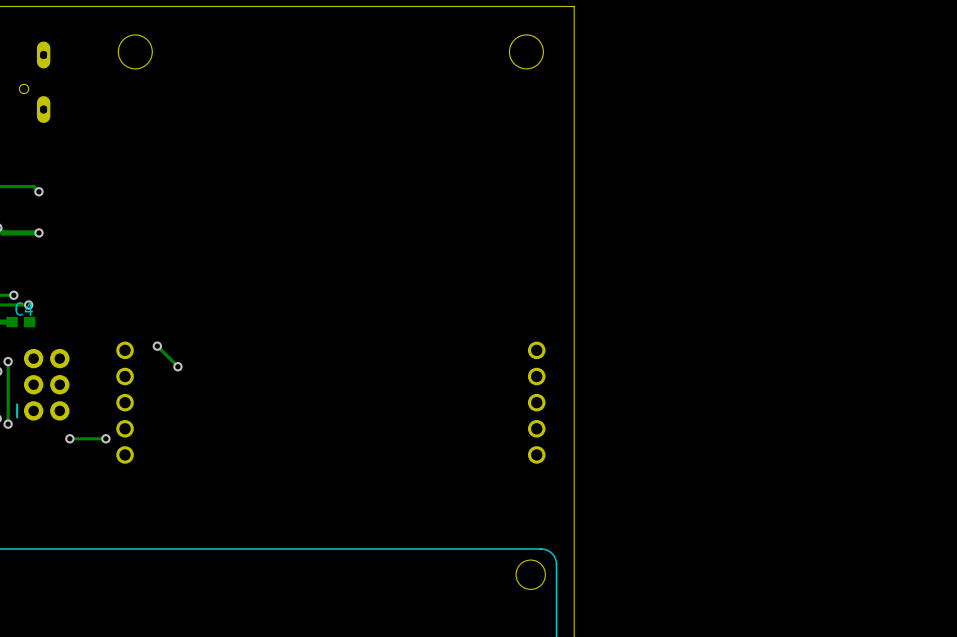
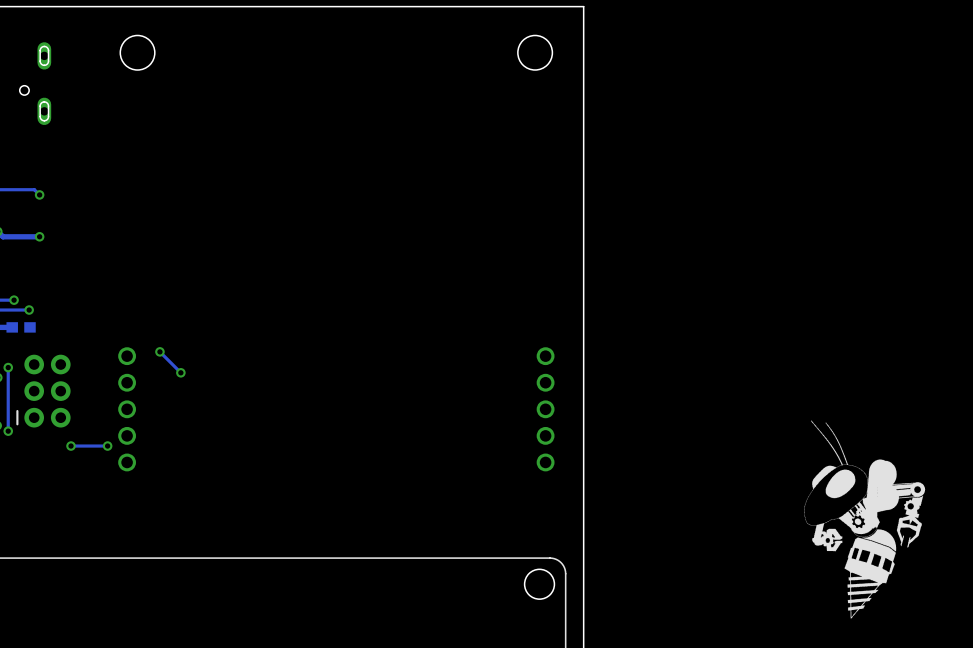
C4 name: C4 (24, 309) -> none
drawing: none -> [804, 420, 926, 619]

